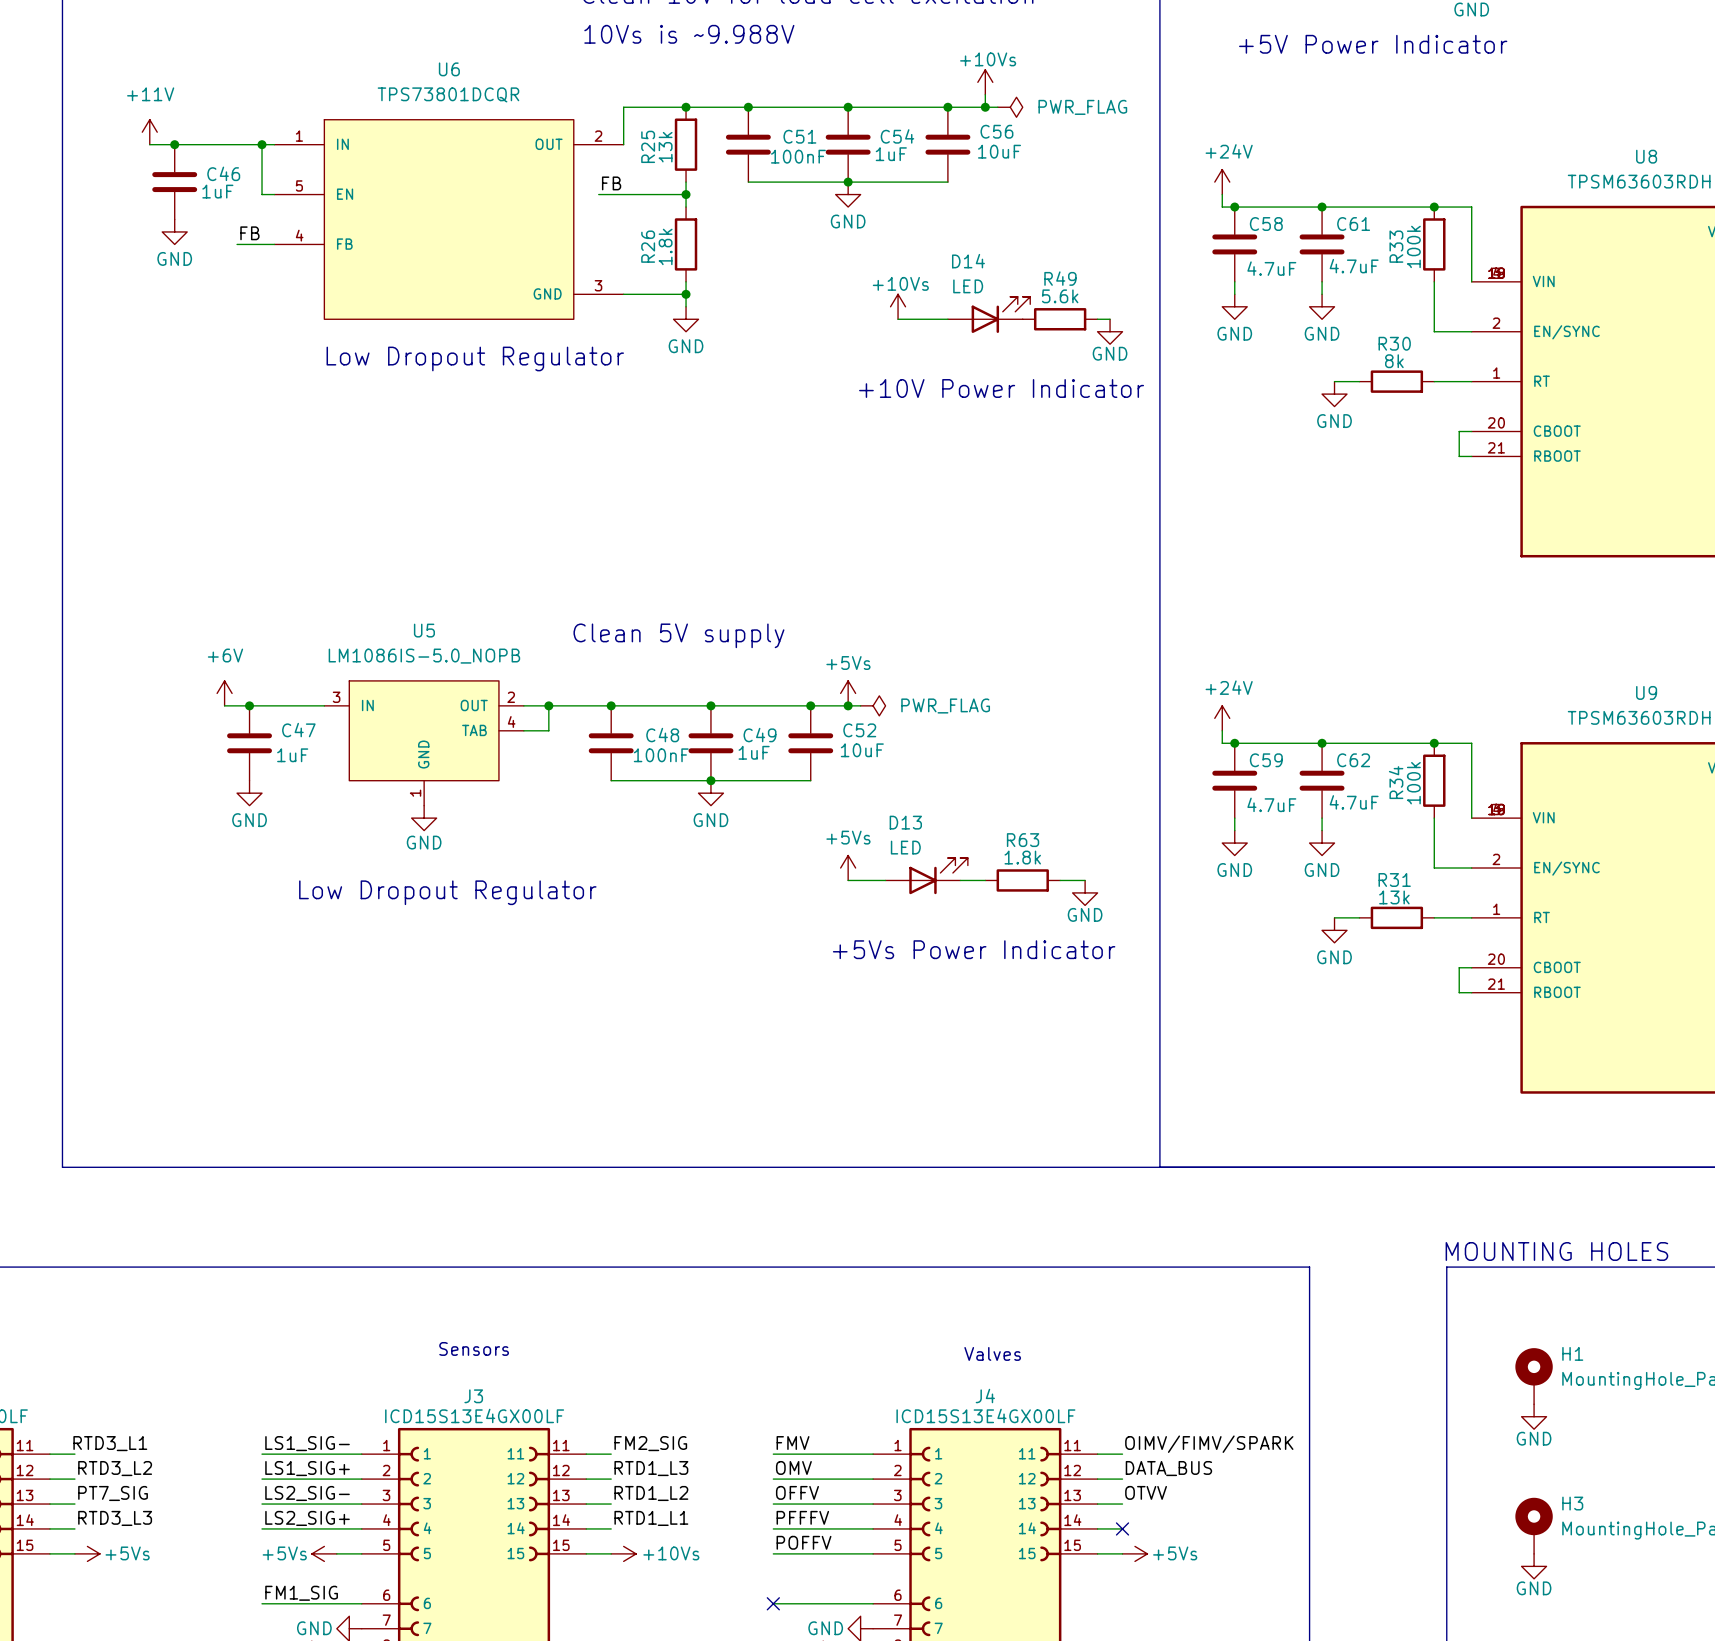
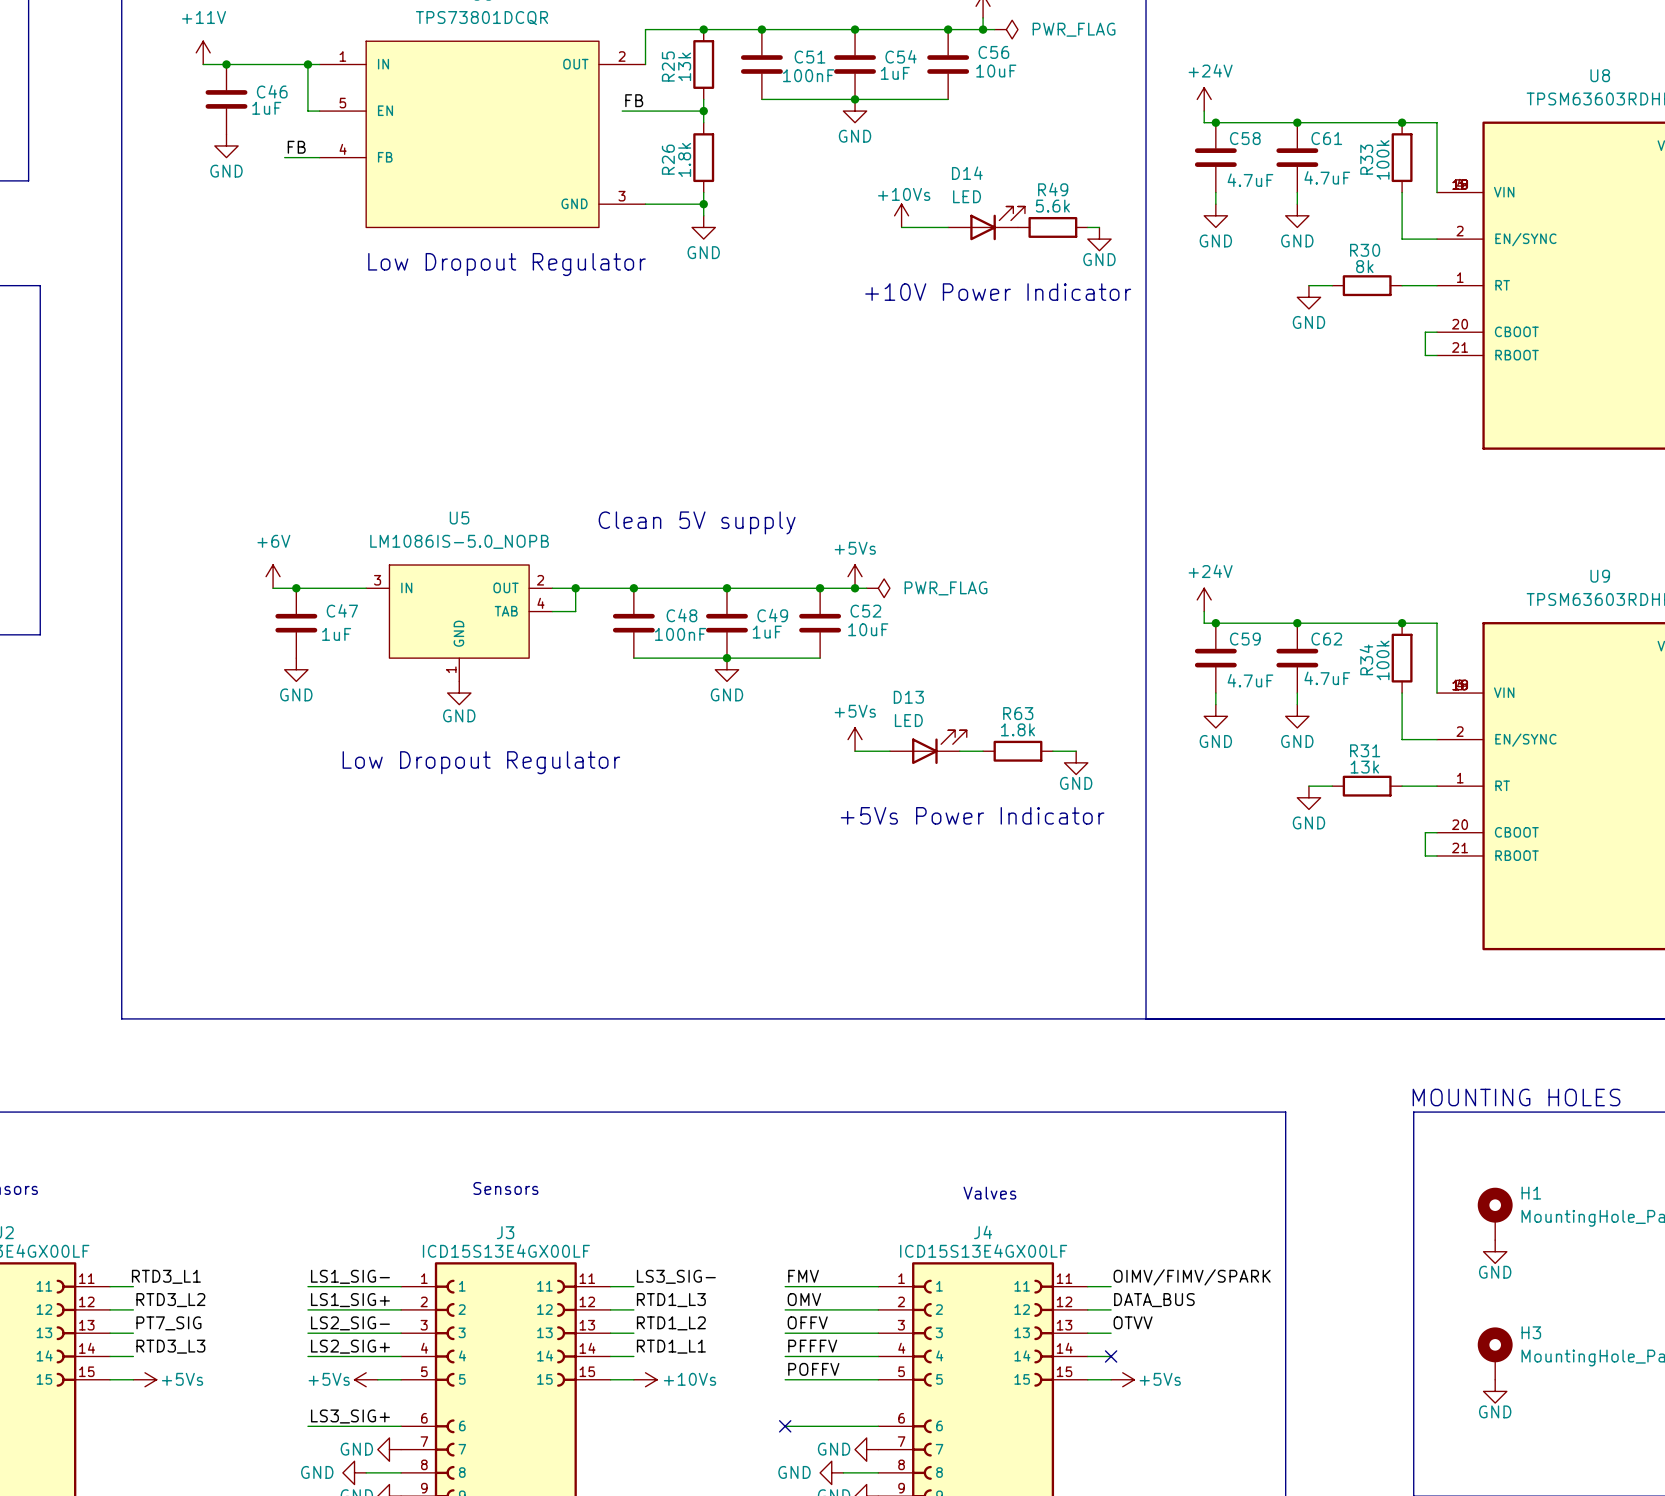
label: FM2_SIG (650, 1443) -> LS3_SIG- (676, 1276)
label: FM1_SIG (301, 1593) -> LS3_SIG+ (350, 1416)

